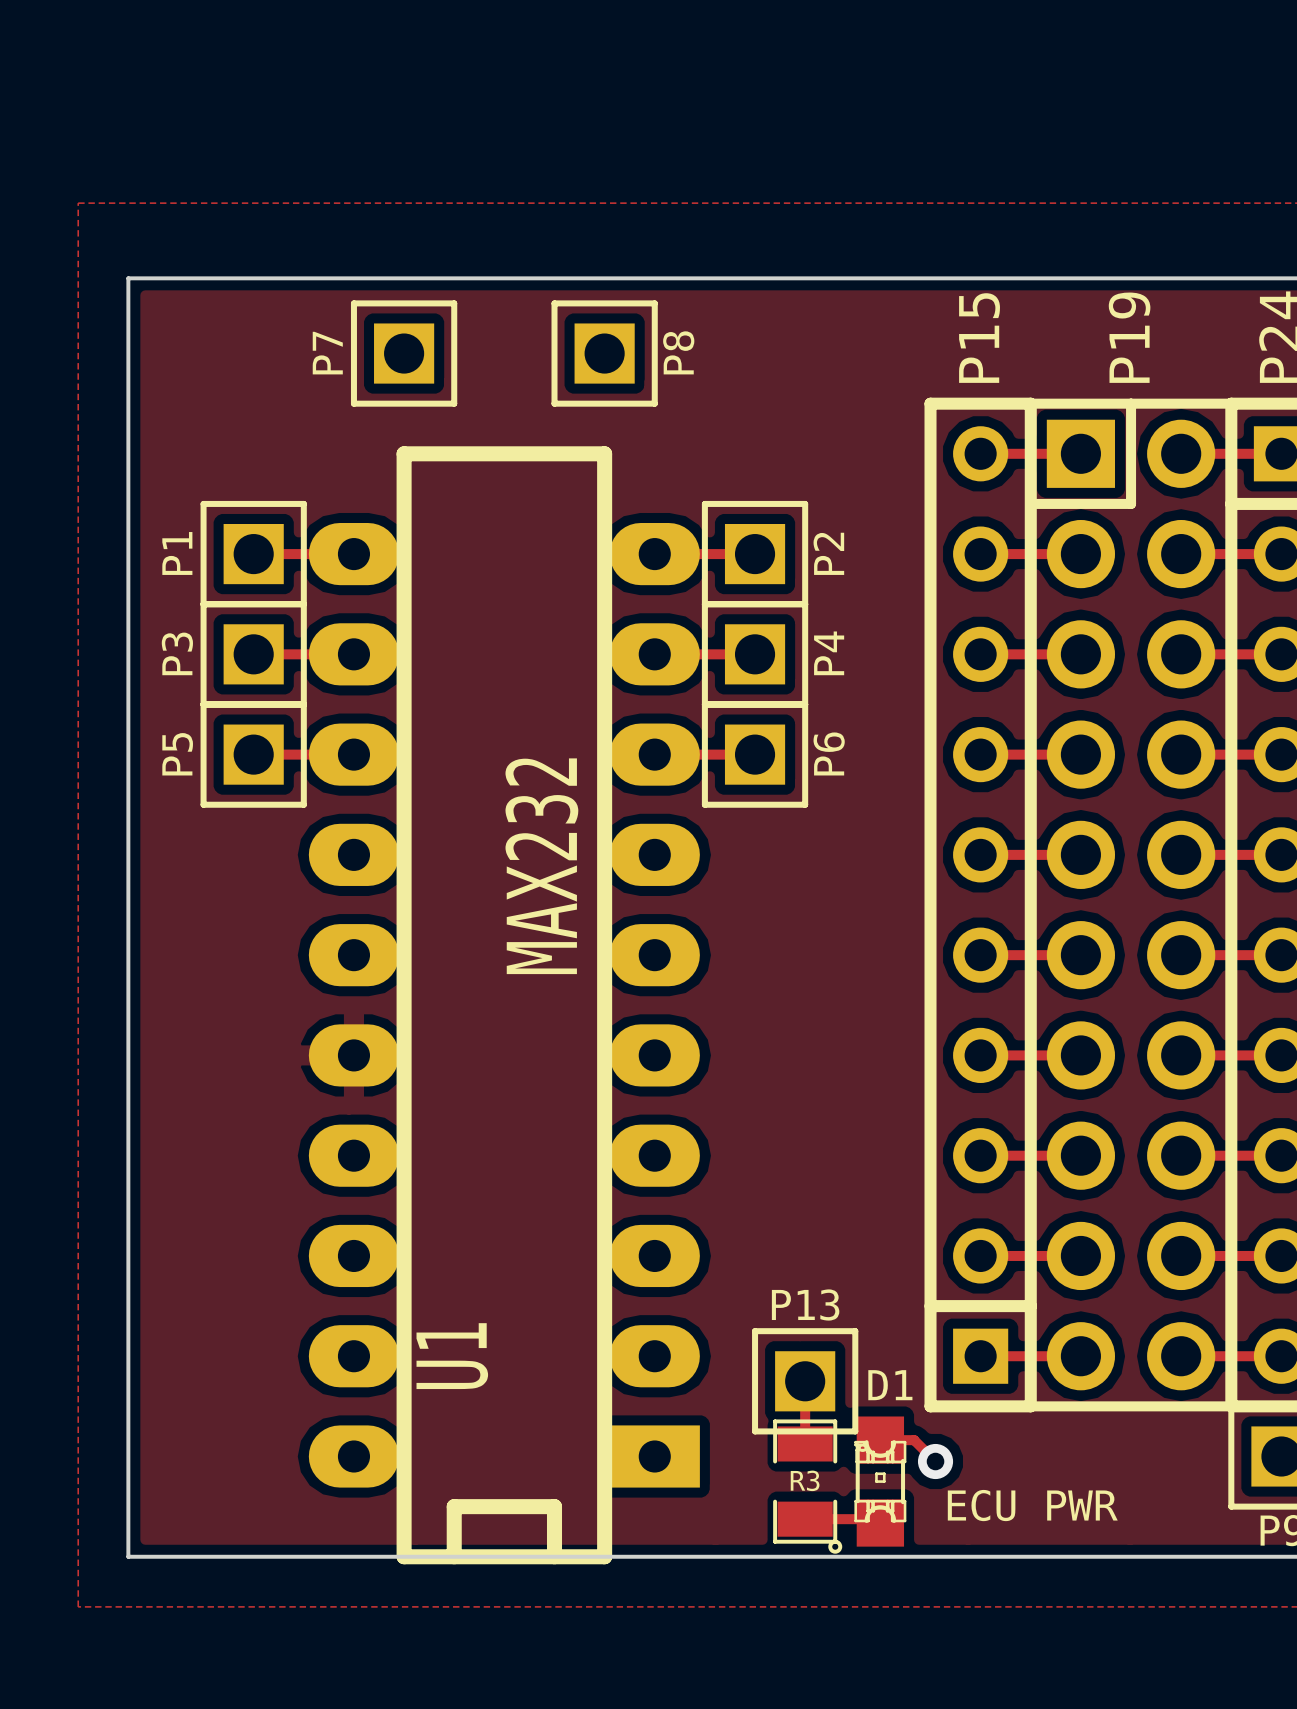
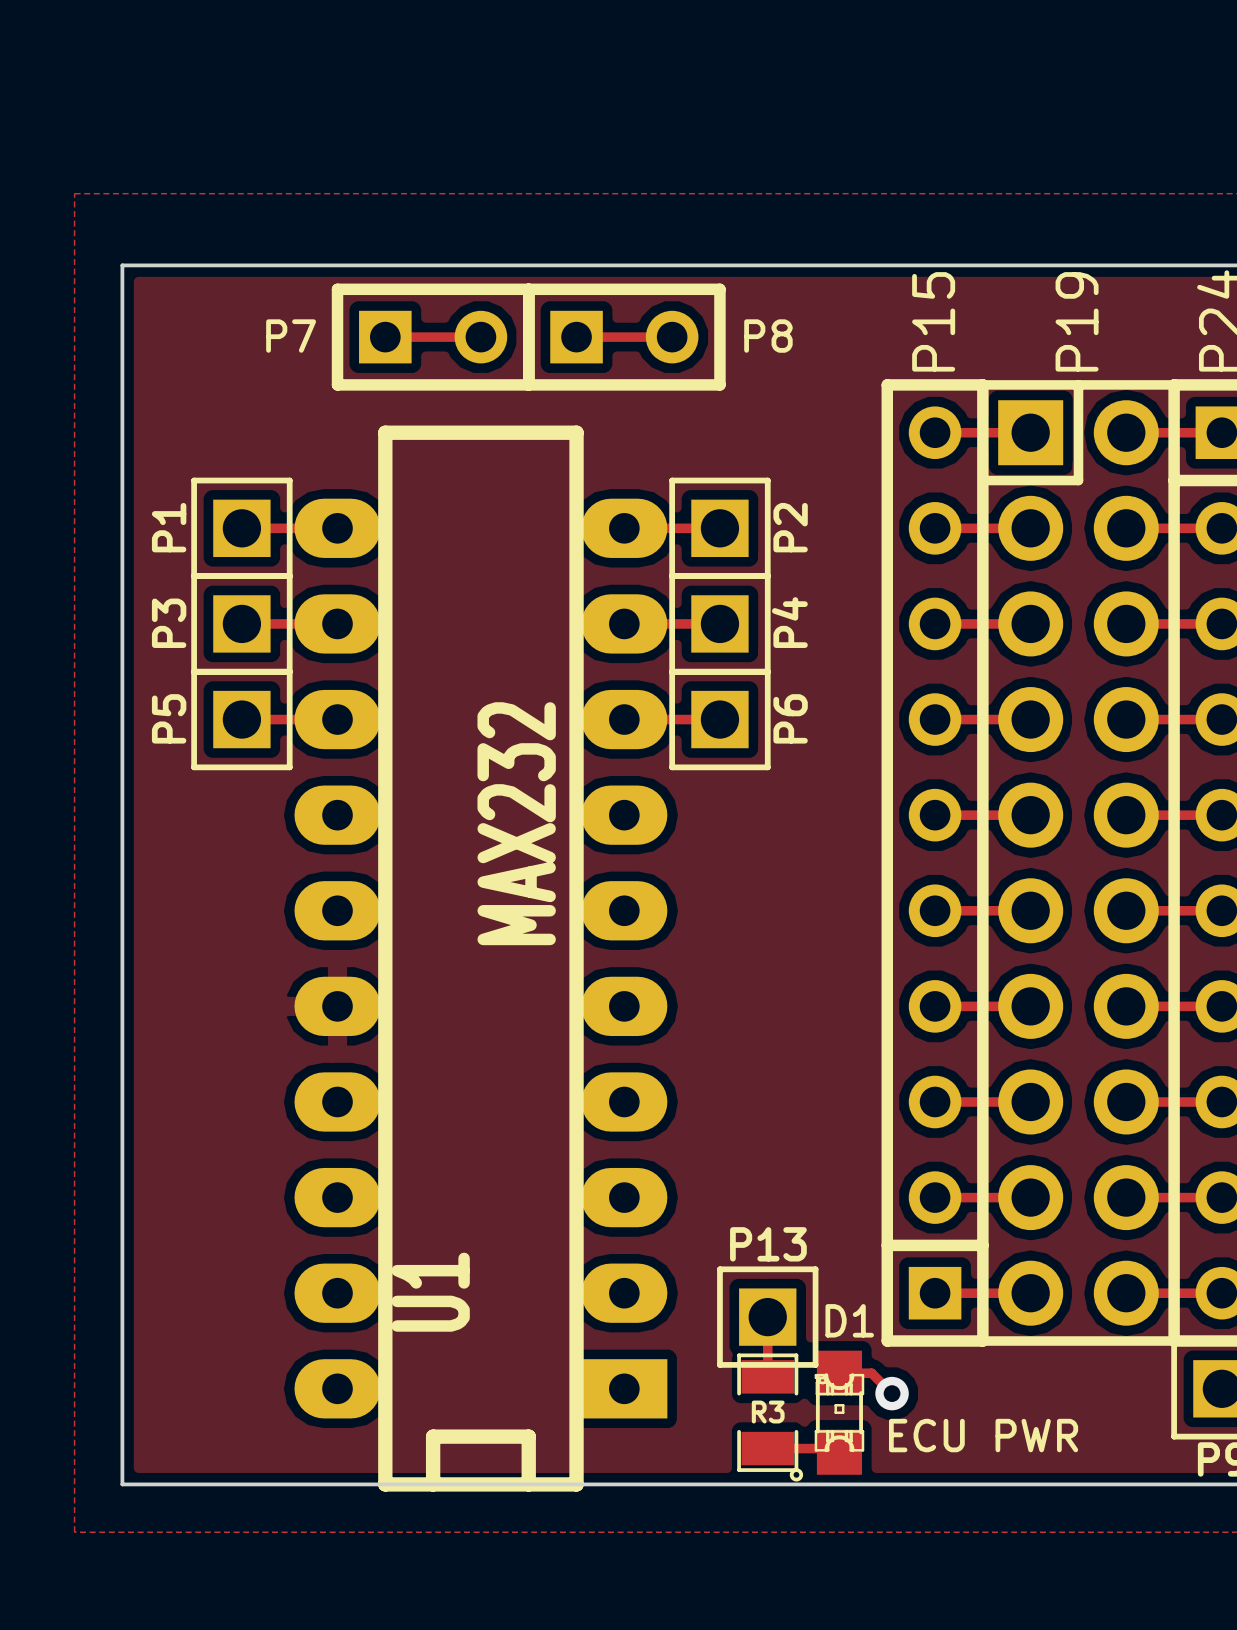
P7 footprint: [350, 300, 458, 407] -> [331, 283, 535, 391]
P8 footprint: [551, 300, 658, 407] -> [523, 283, 726, 391]
track: none -> (385, 337) (480, 337)
track: none -> (576, 337) (672, 337)

